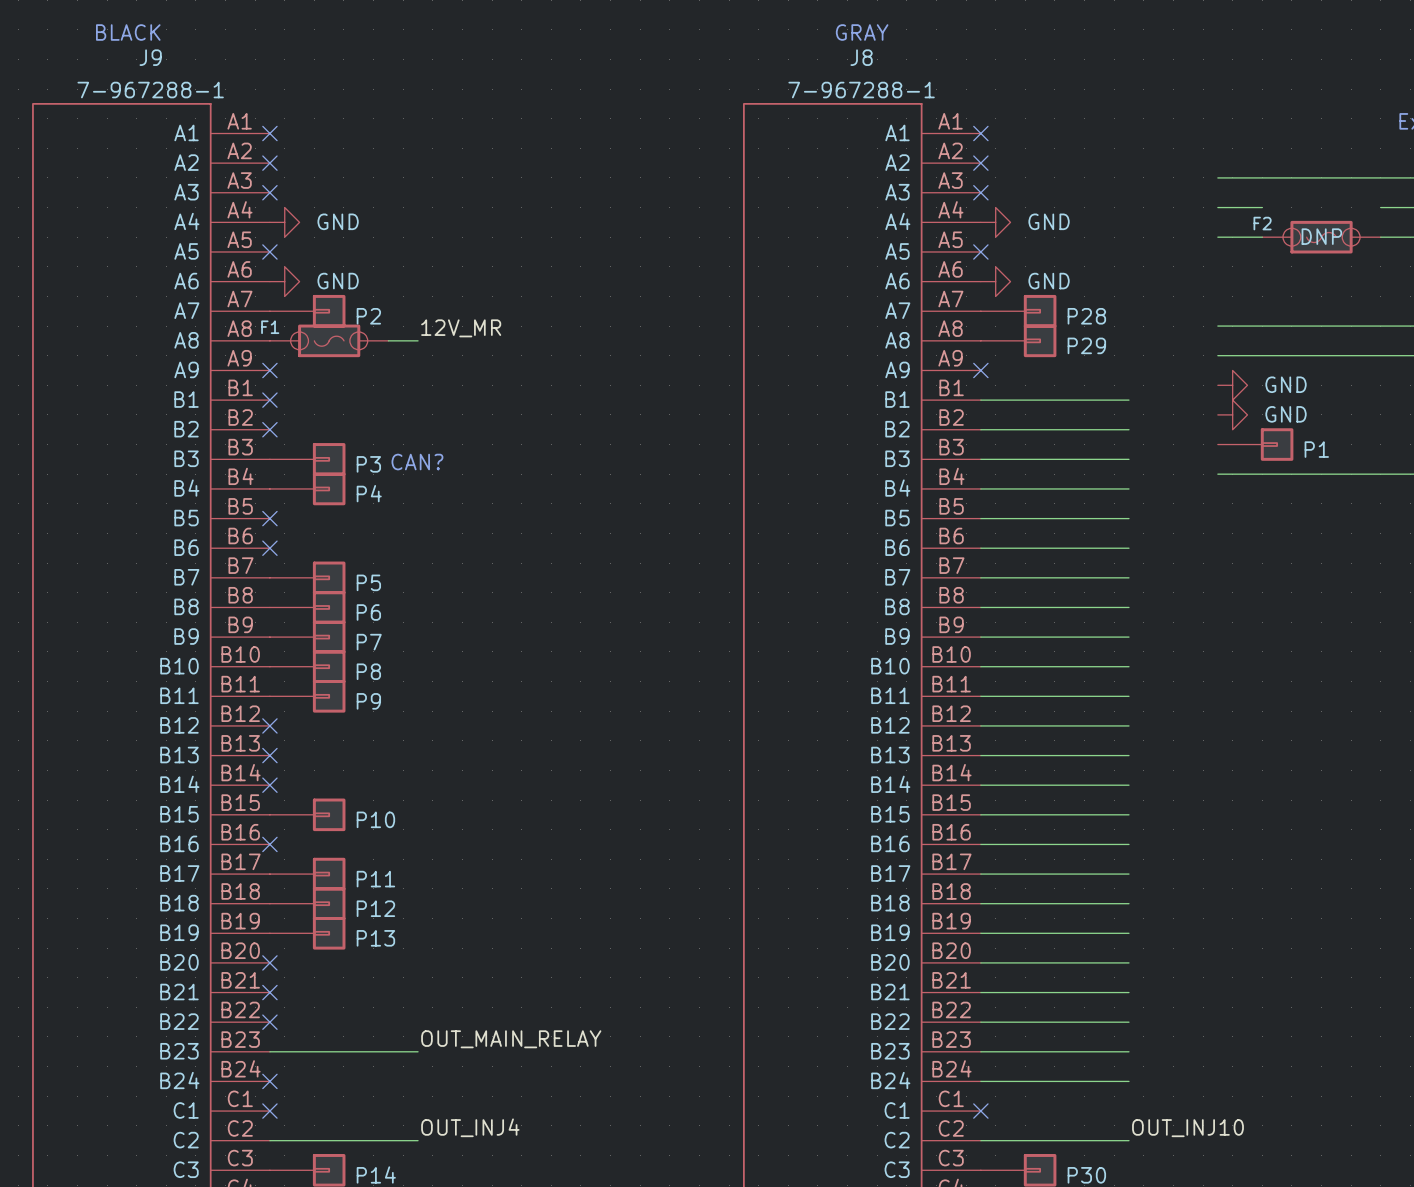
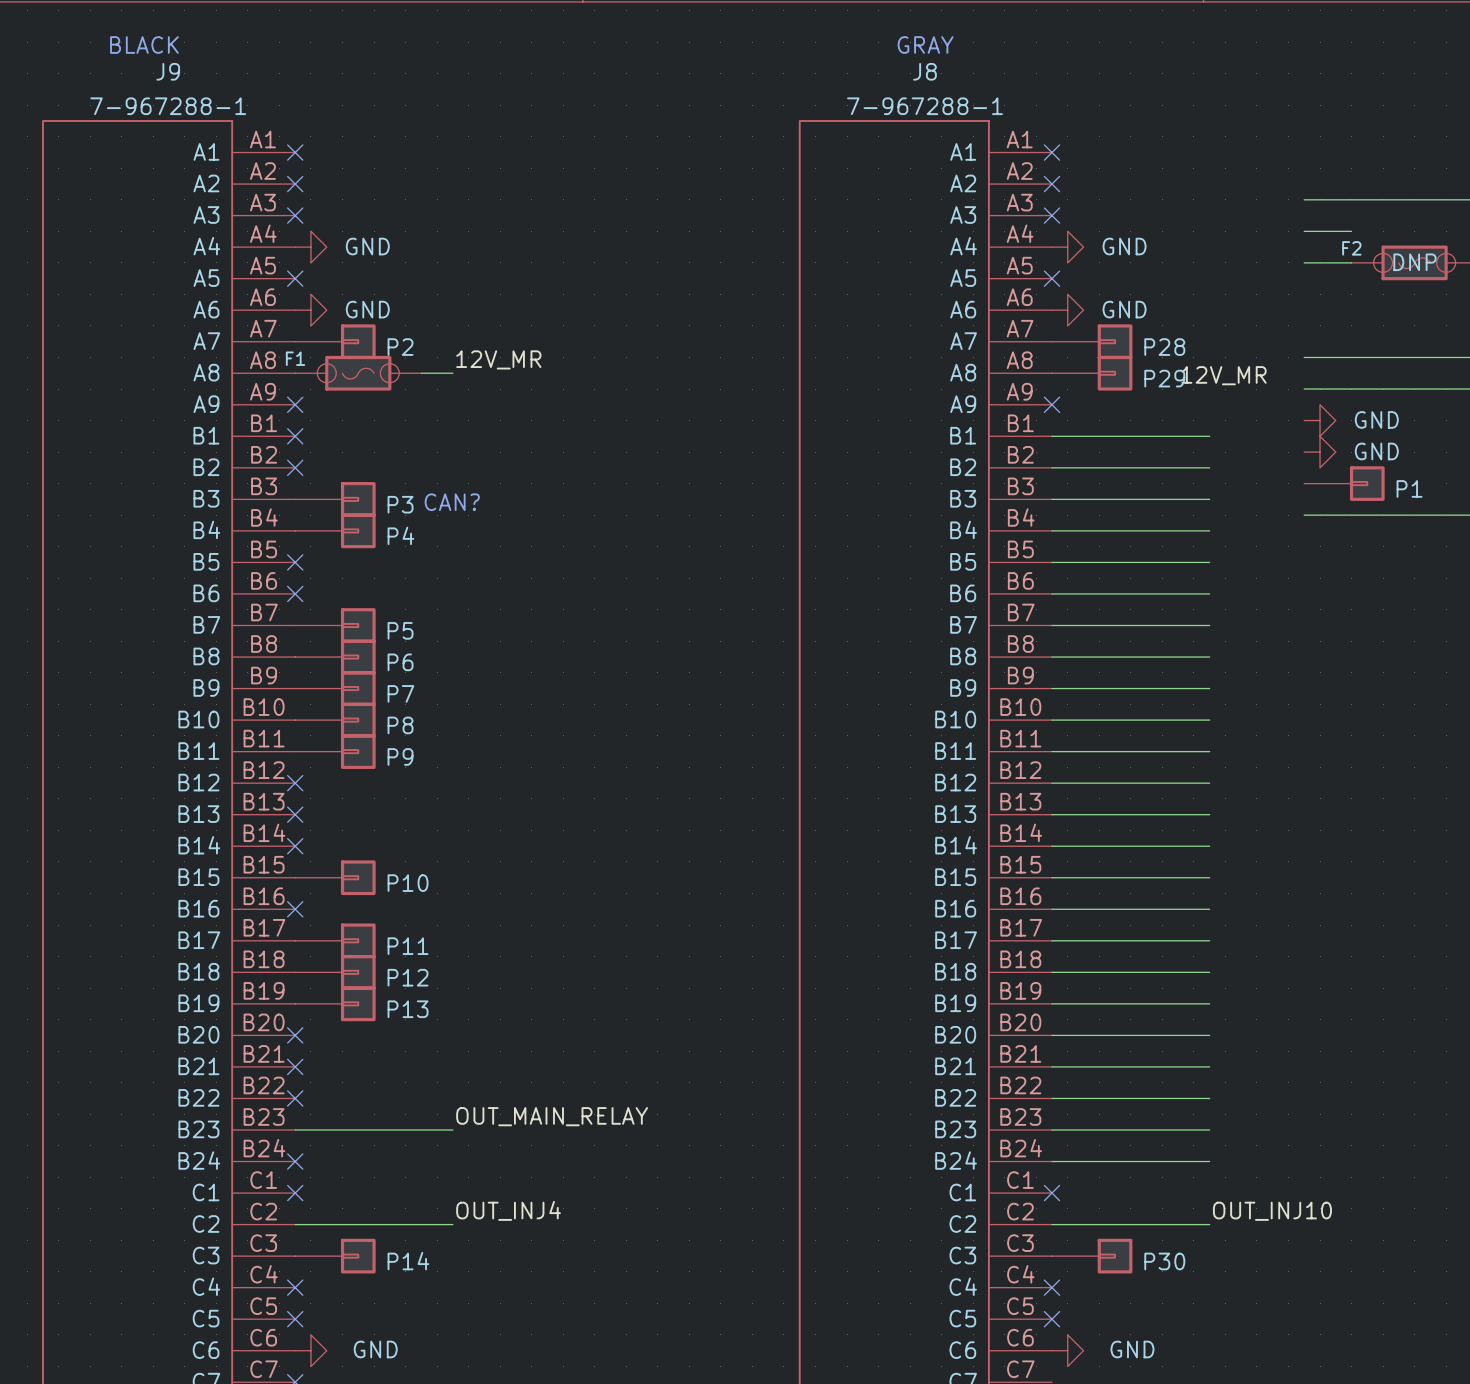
label: none -> 12V_MR (1224, 375)

